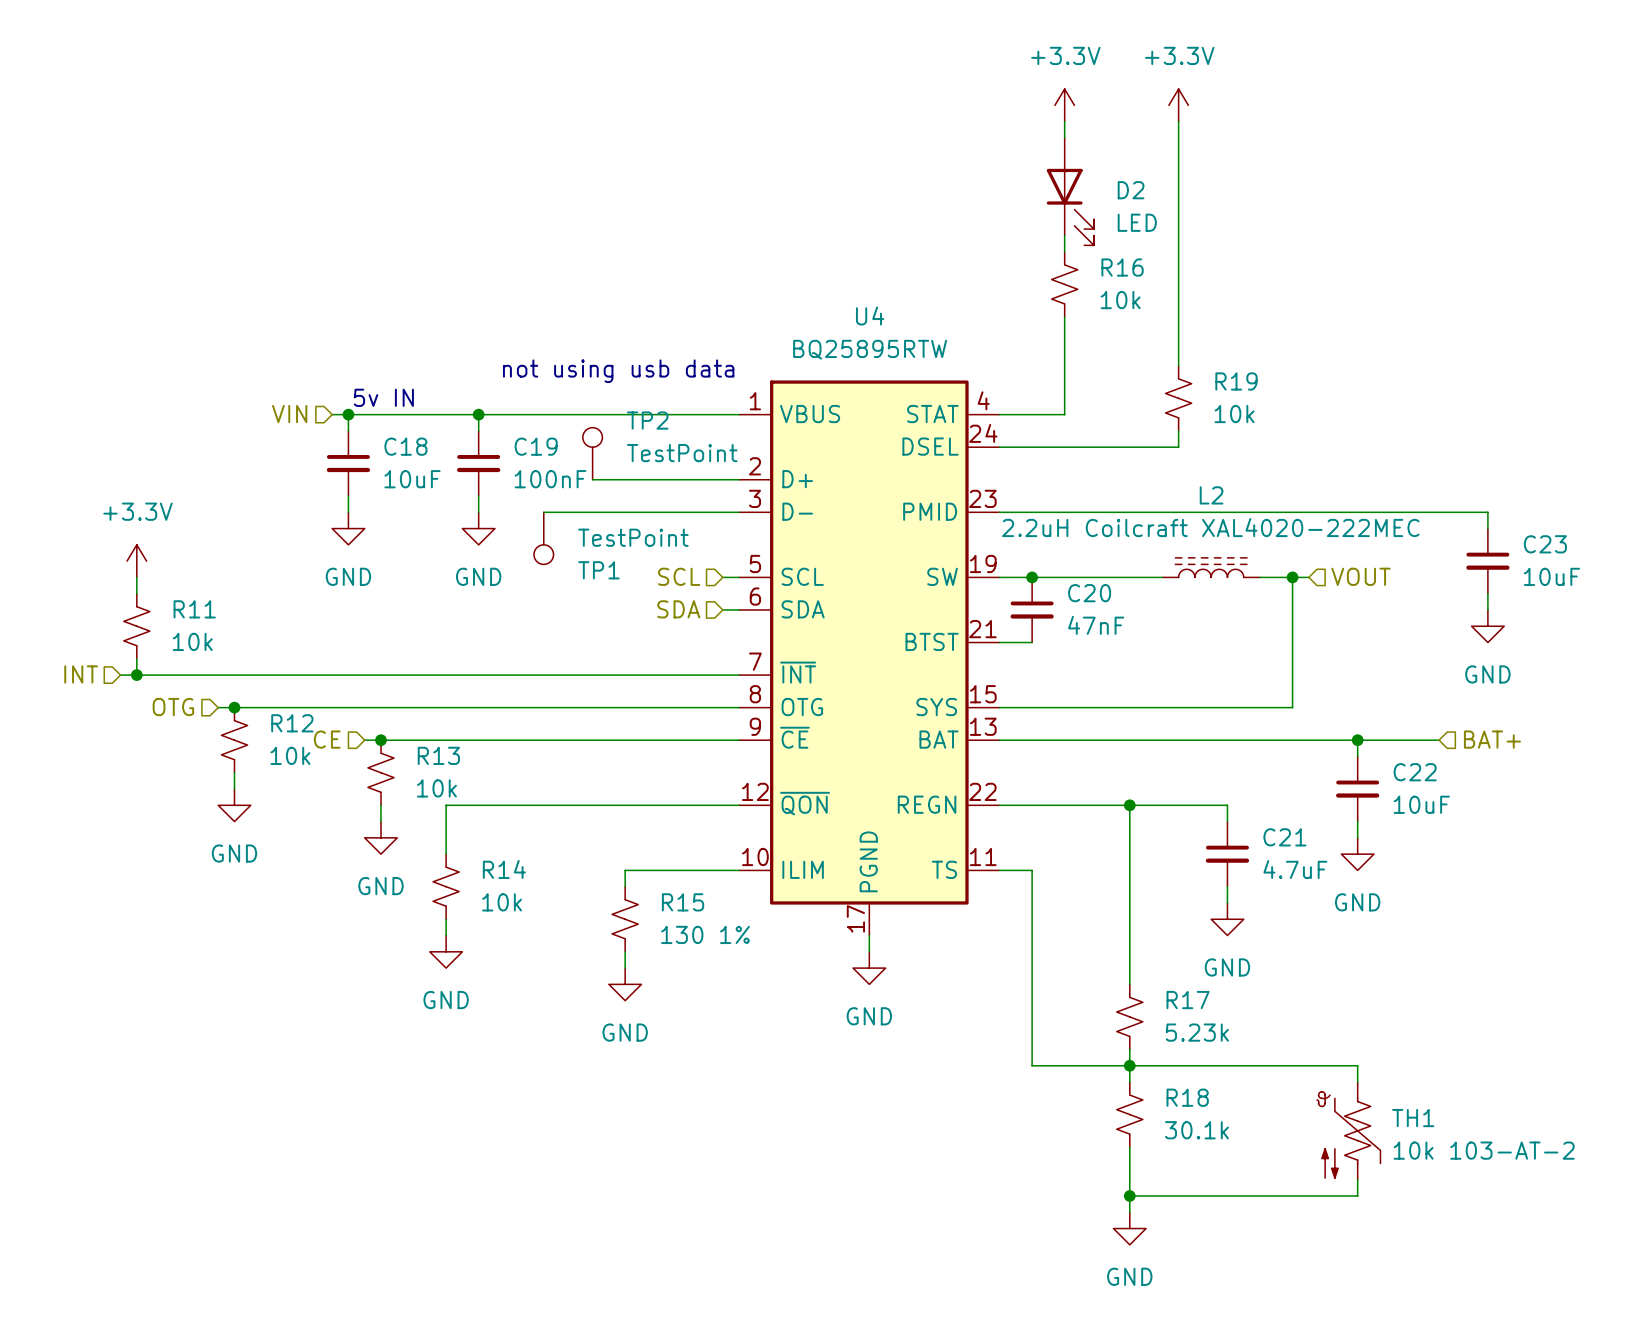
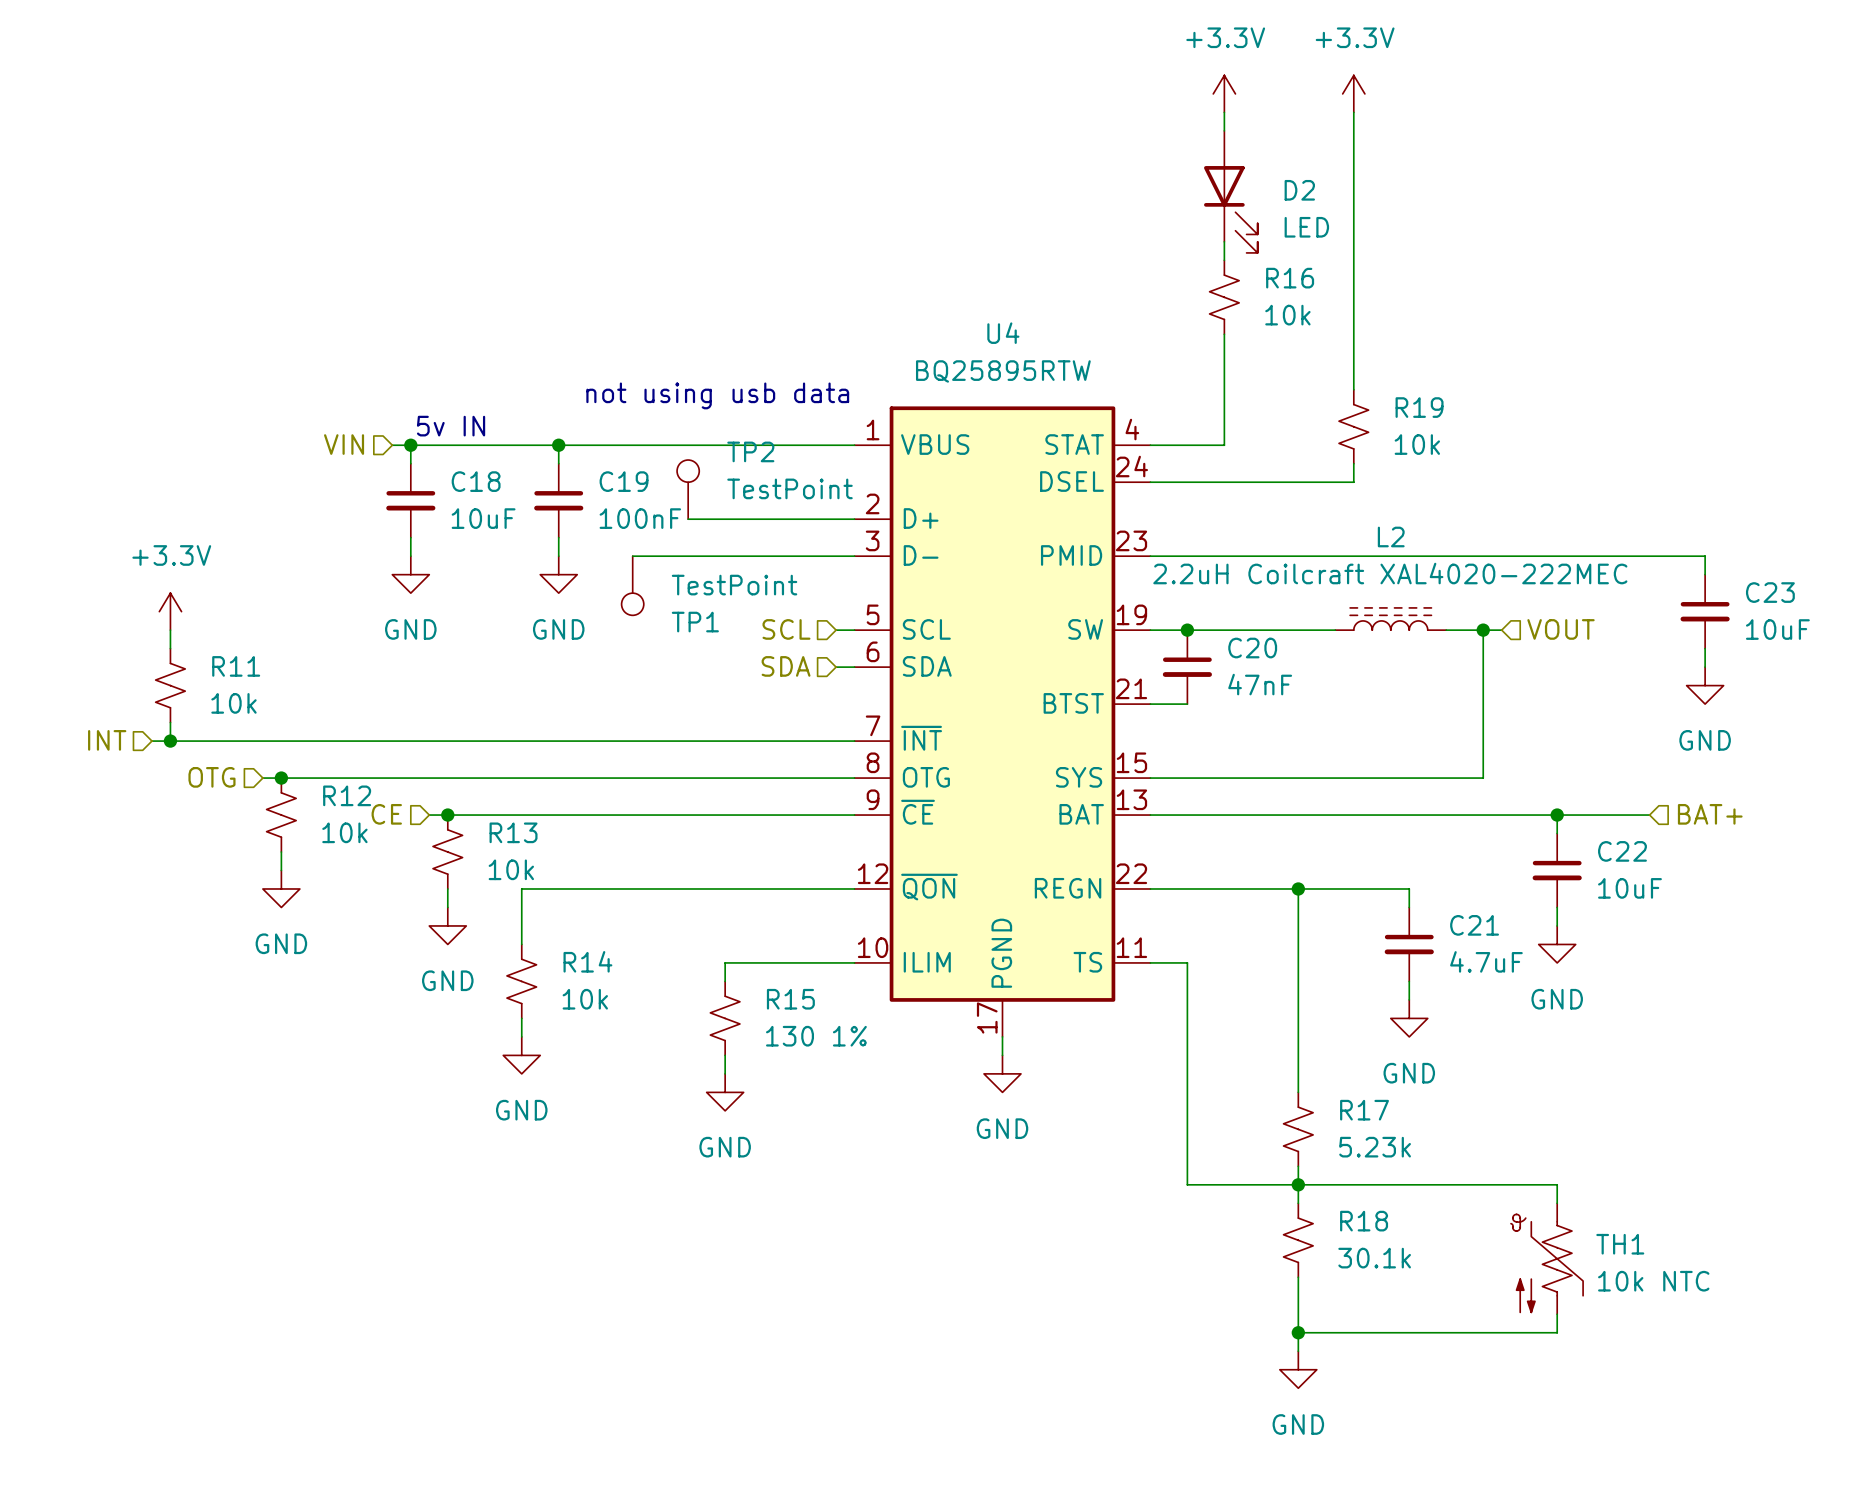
TH1 value: 10k 103-AT-2 (1484, 1150) -> 10k NTC (1653, 1281)

